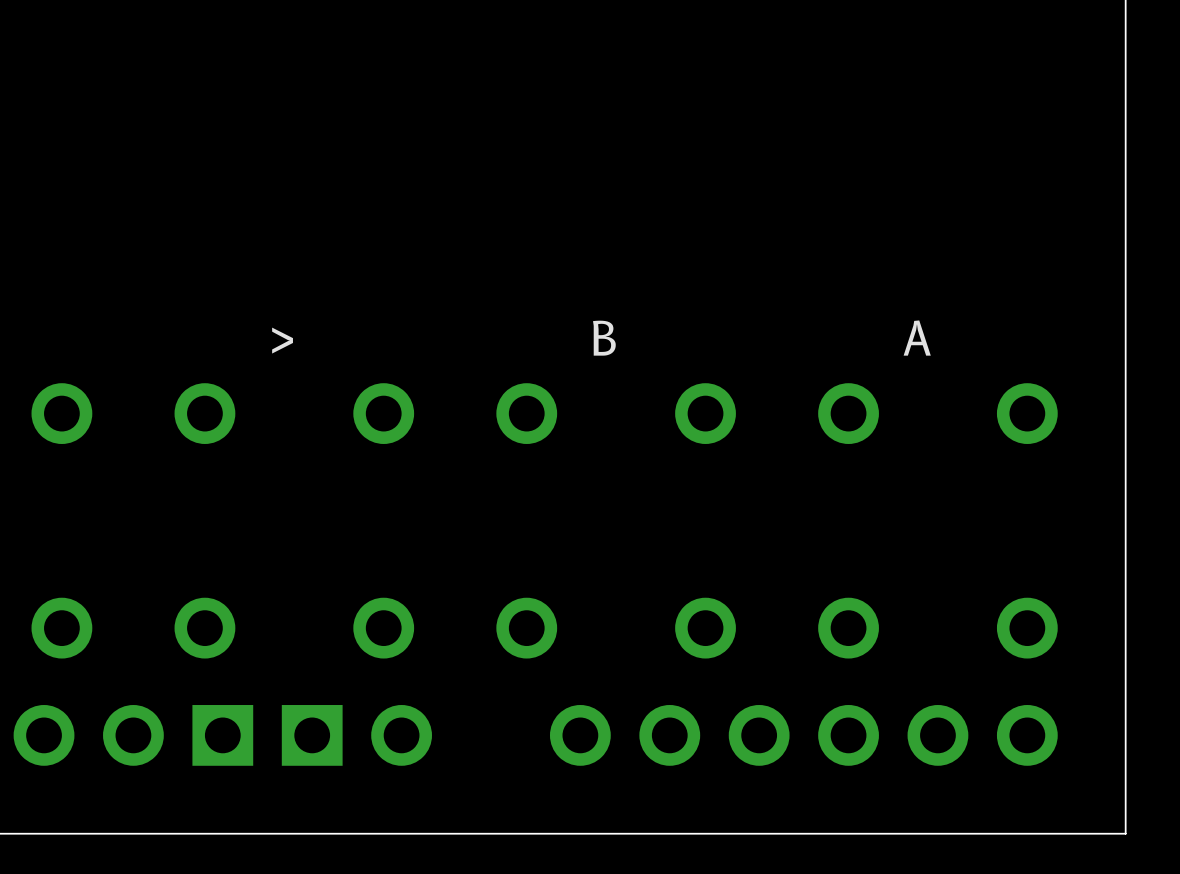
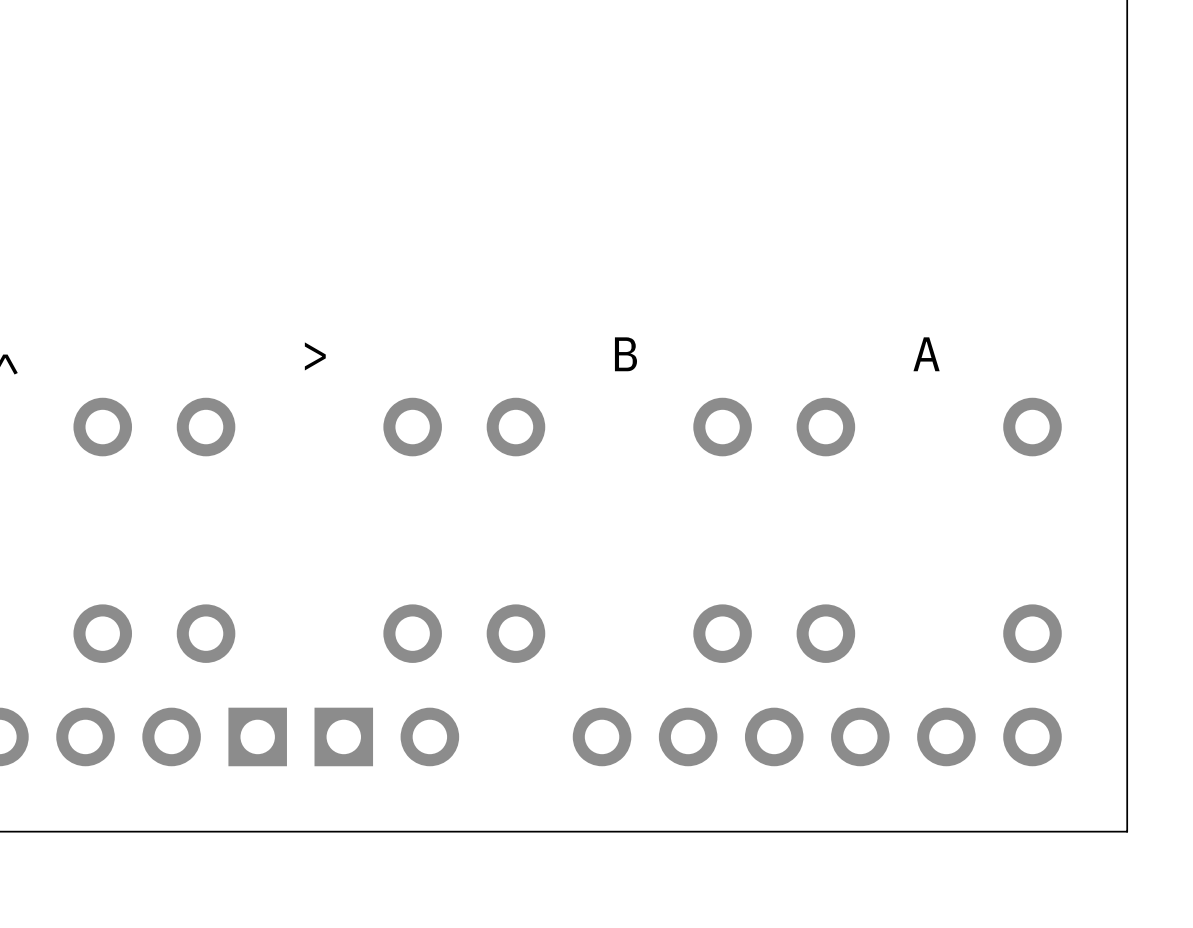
part position: (204, 413) -> (206, 427)
part position: (526, 413) -> (515, 427)
part position: (848, 413) -> (825, 427)
part position: (204, 628) -> (206, 633)
part position: (526, 628) -> (515, 633)
part position: (848, 628) -> (825, 633)

